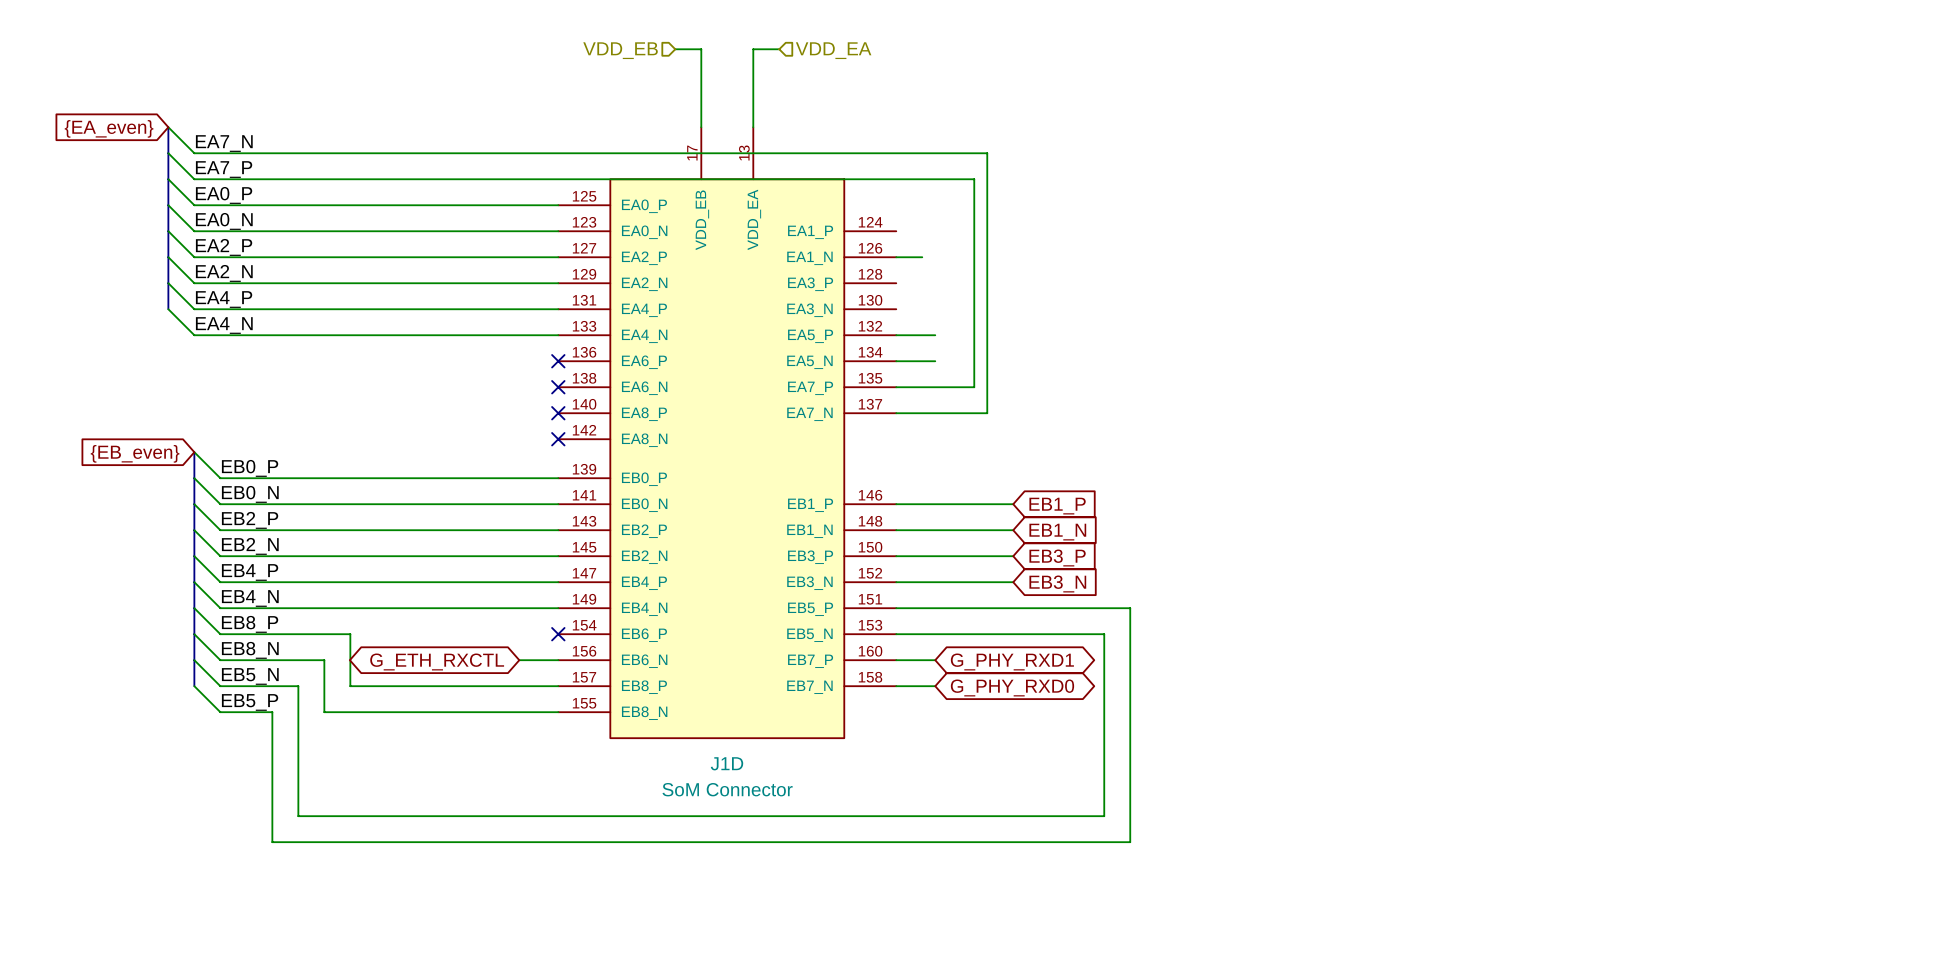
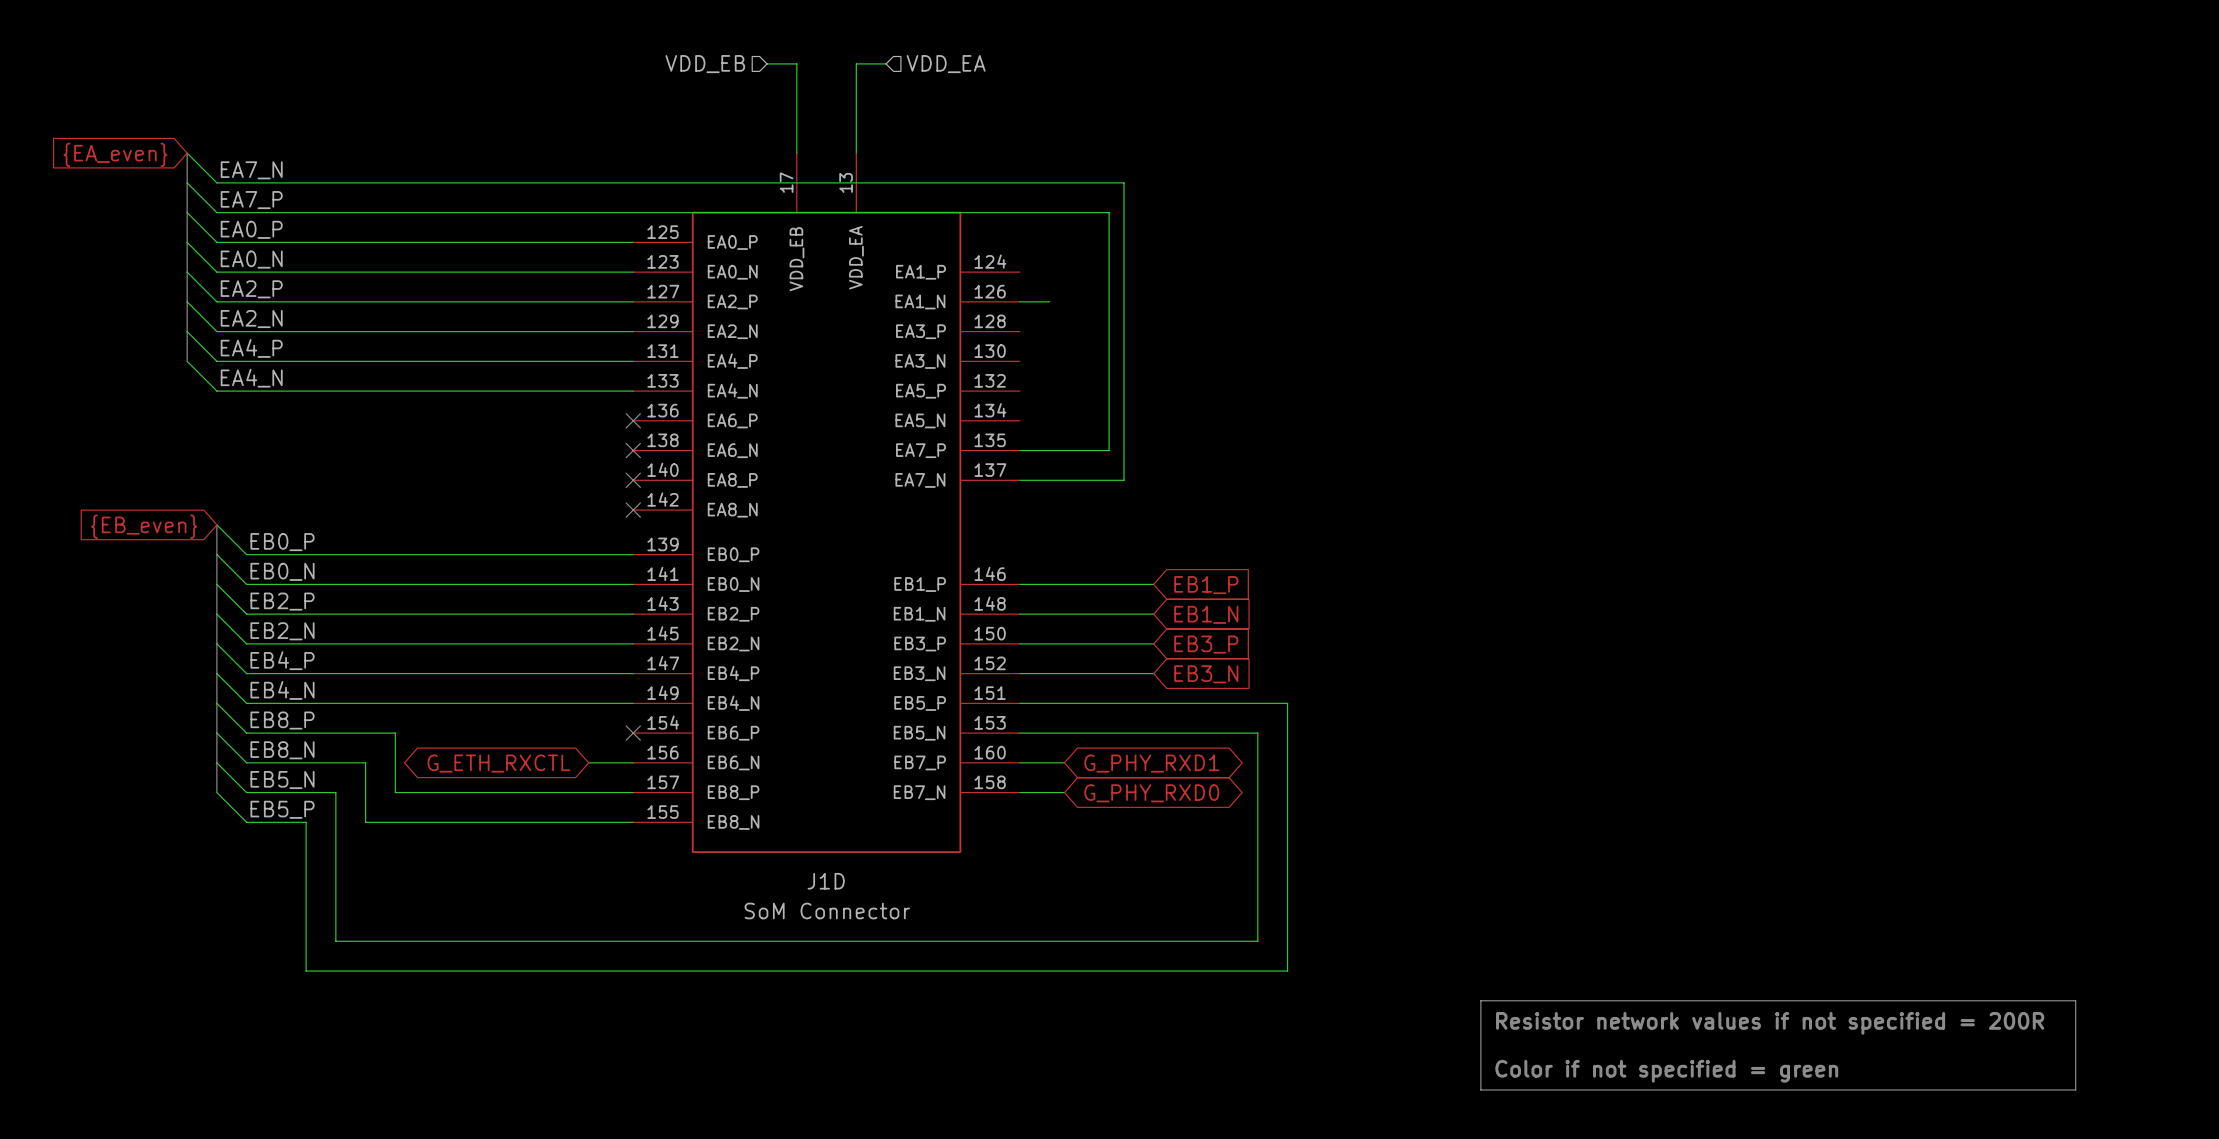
wire: (896, 335) (935, 335) -> none
wire: (896, 361) (935, 361) -> none
line: none -> (1480, 1000) (2075, 1000) (2075, 1089) (1480, 1089) (1480, 1000)
text: none -> Resistor network values if not specified = 200R (1770, 1023)
text: none -> Color if not specified = green (1666, 1071)

